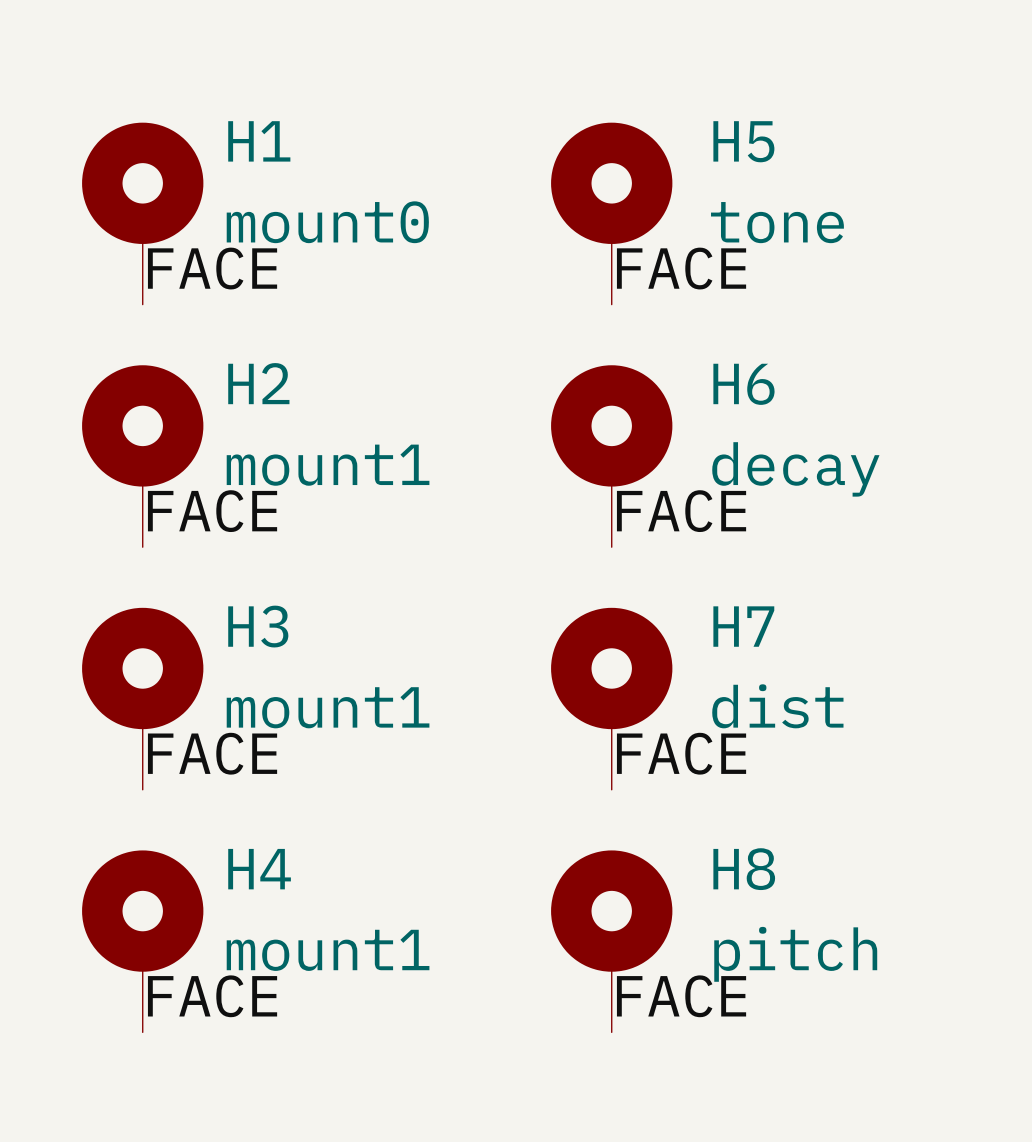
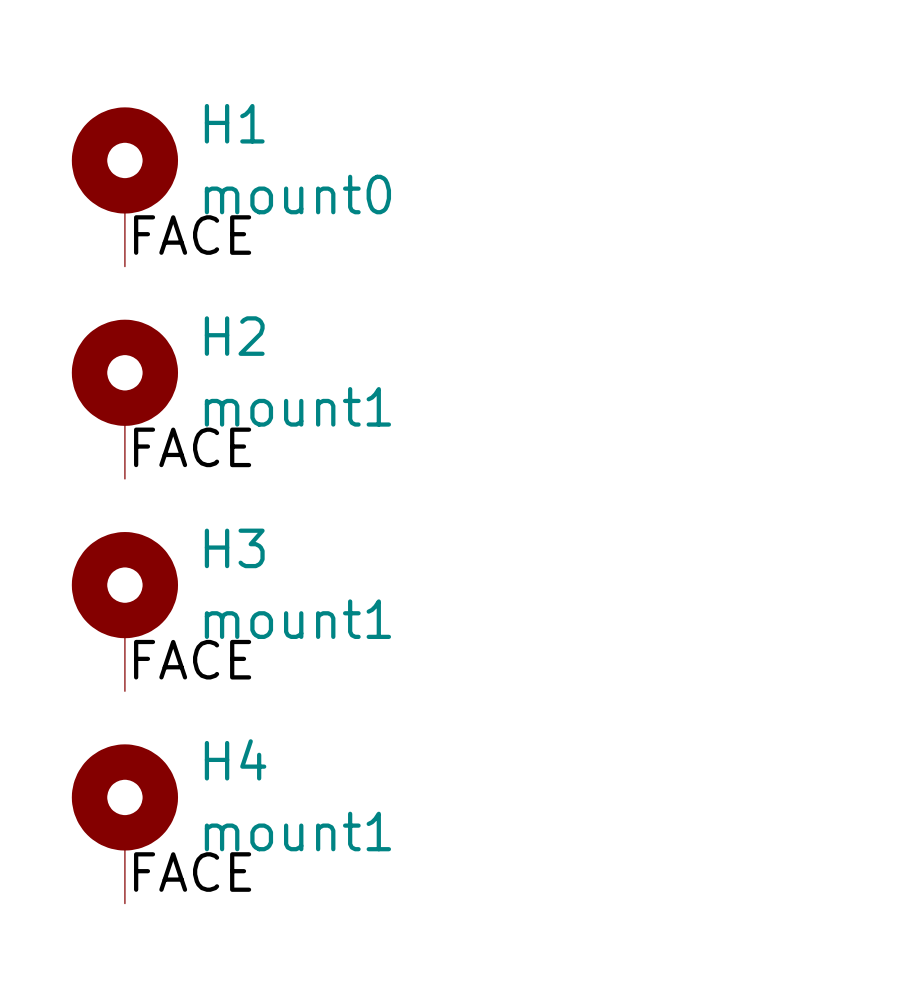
H5: tone (611, 213) -> none
label: FACE (681, 268) -> none
H6: decay (611, 456) -> none
label: FACE (681, 511) -> none
H7: dist (611, 698) -> none
label: FACE (681, 753) -> none
H8: pitch (611, 941) -> none
label: FACE (681, 996) -> none

